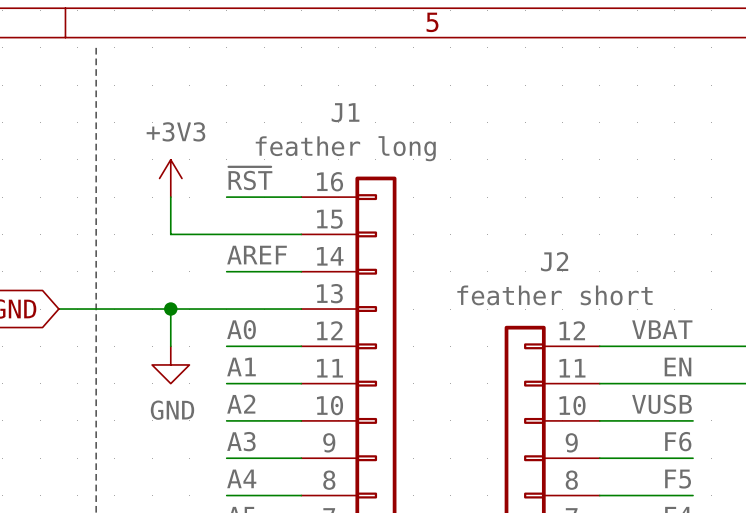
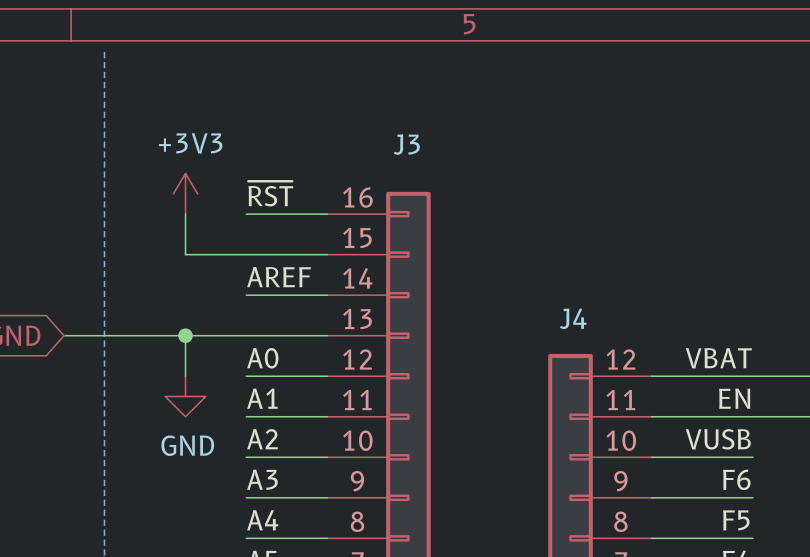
J1 name: J1 (345, 112) -> J3 (406, 144)
J1 value: feather long (345, 148) -> none
J2 name: J2 (554, 261) -> J4 (573, 318)
J2 value: feather short (554, 295) -> none

